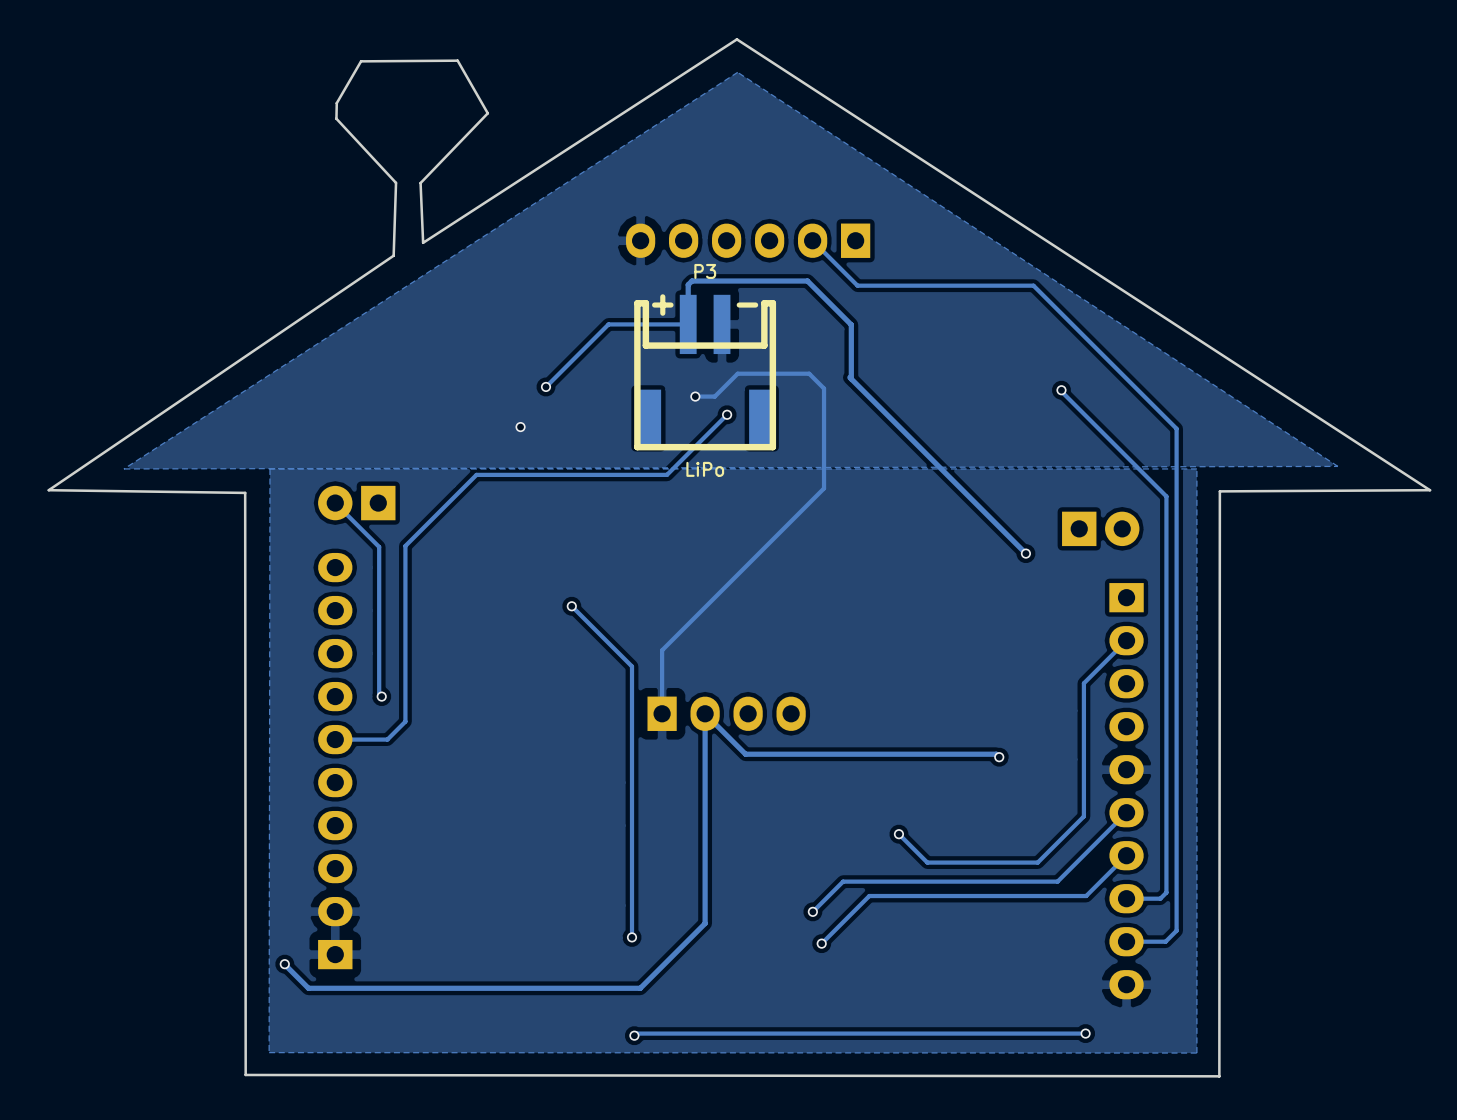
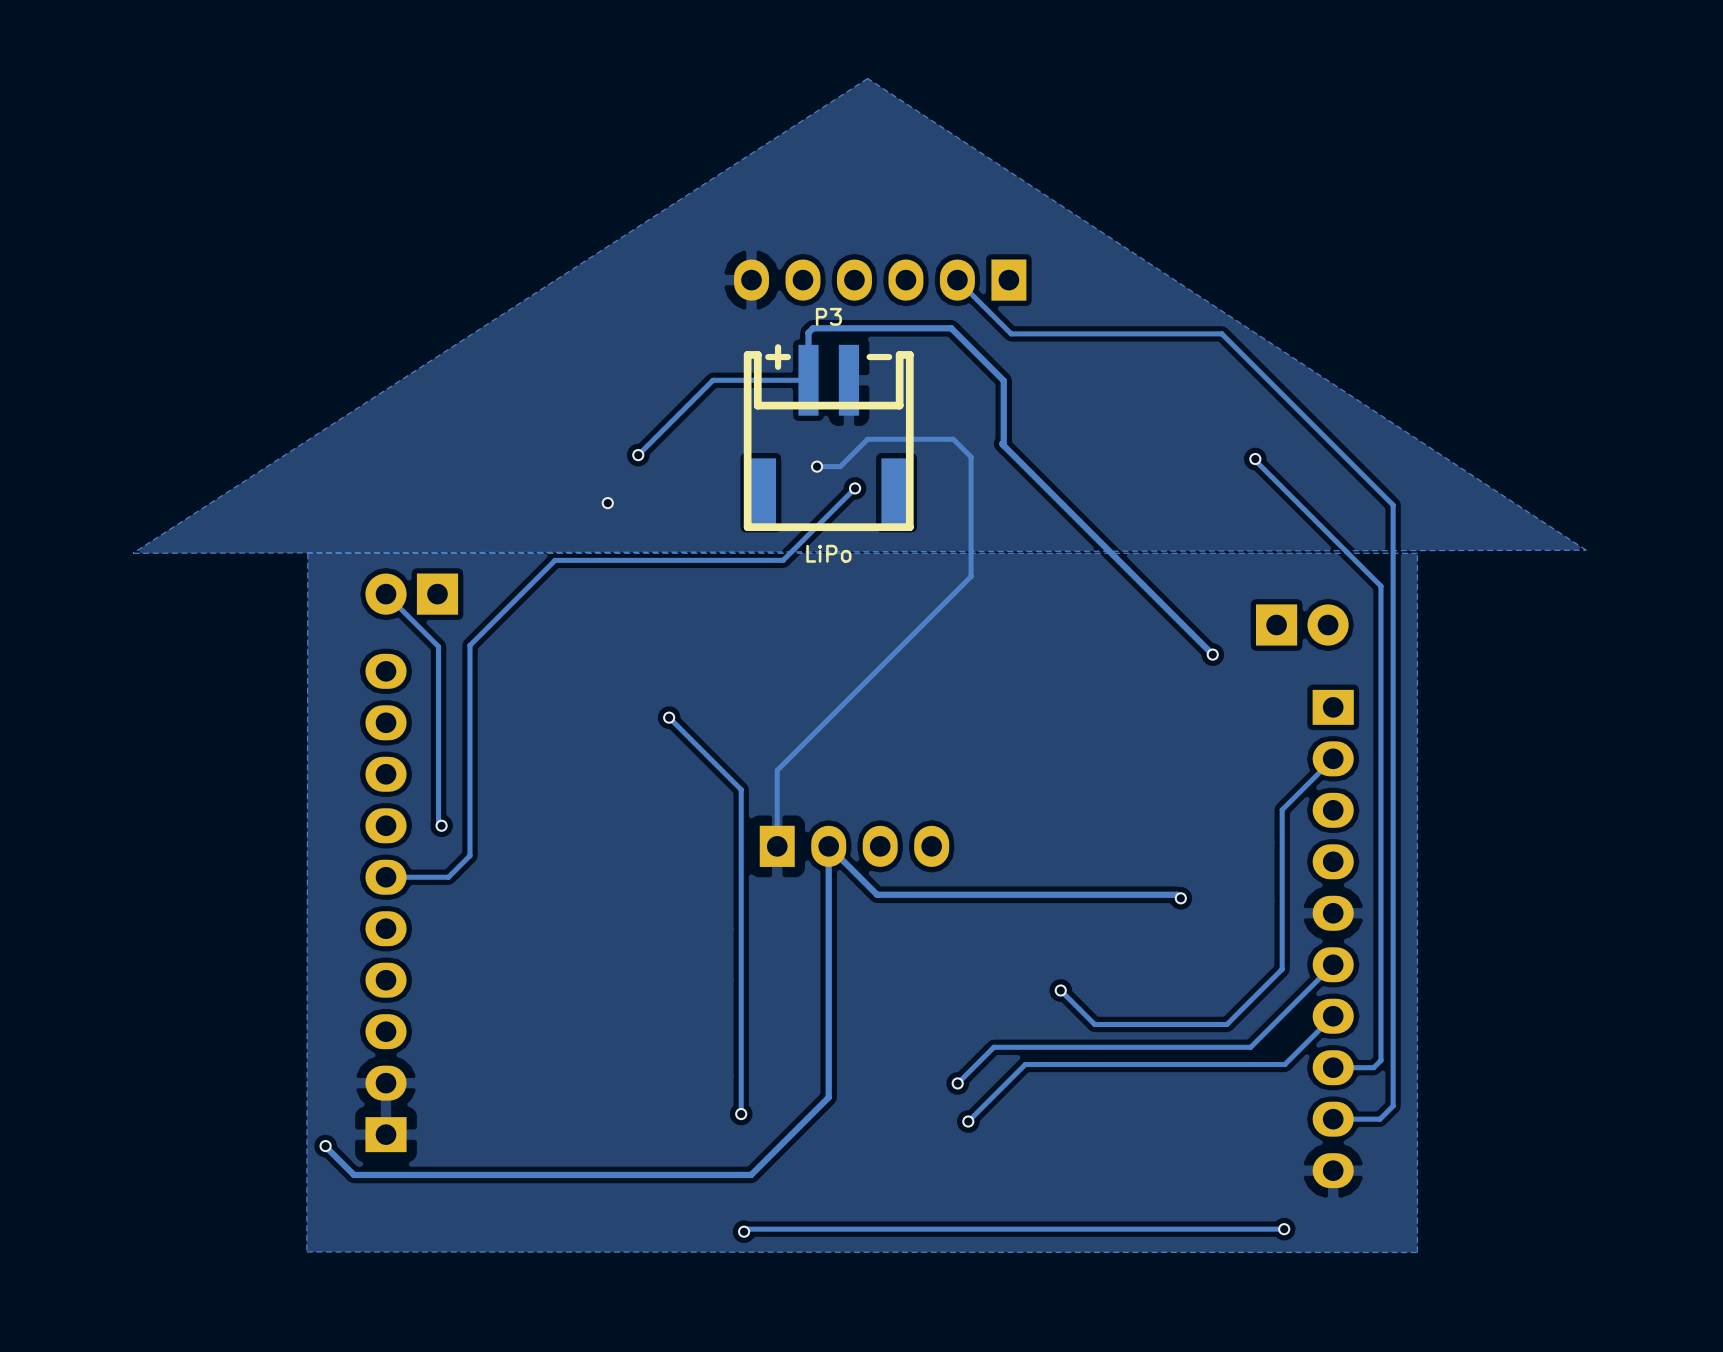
board edge: (736, 39) (1429, 490) -> none
board edge: (737, 39) (423, 242) -> none
board edge: (361, 61) (336, 103) (336, 118) (396, 182) (393, 255) (48, 490) (245, 492) (245, 1074) (1219, 1076) -> none
board edge: (361, 61) (457, 60) (487, 113) (420, 183) (423, 242) -> none
board edge: (1430, 490) (1219, 491) -> none
board edge: (1219, 491) (1219, 1076) -> none

